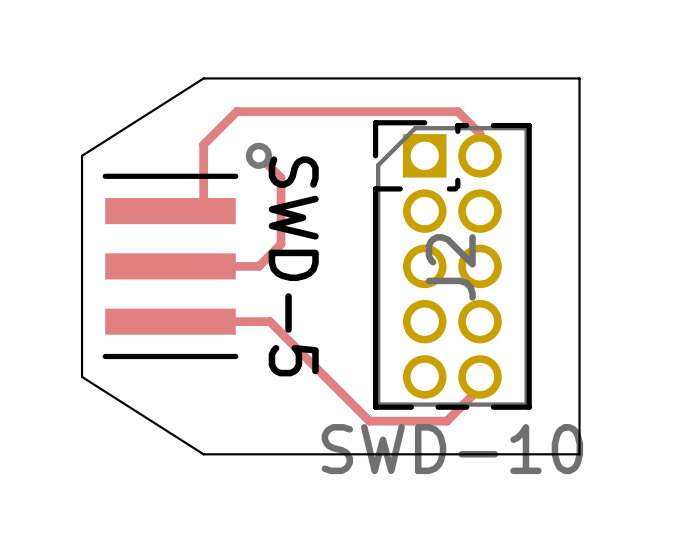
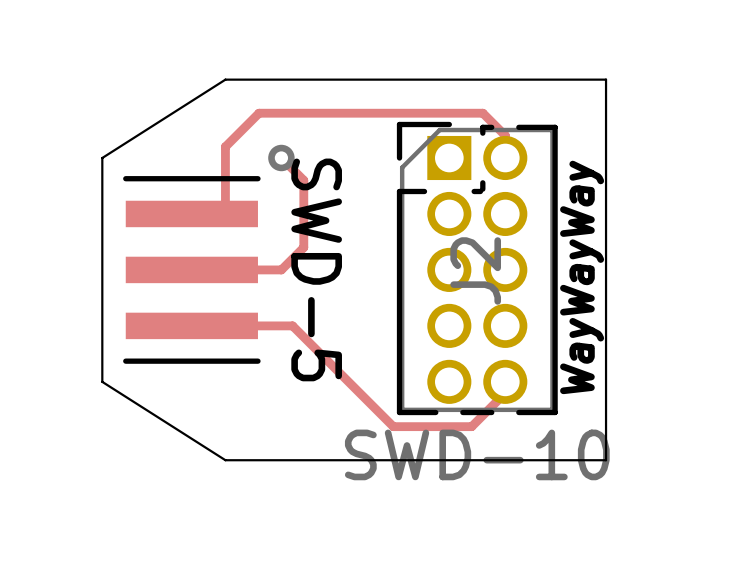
text: none -> WayWayWay (582, 277)

